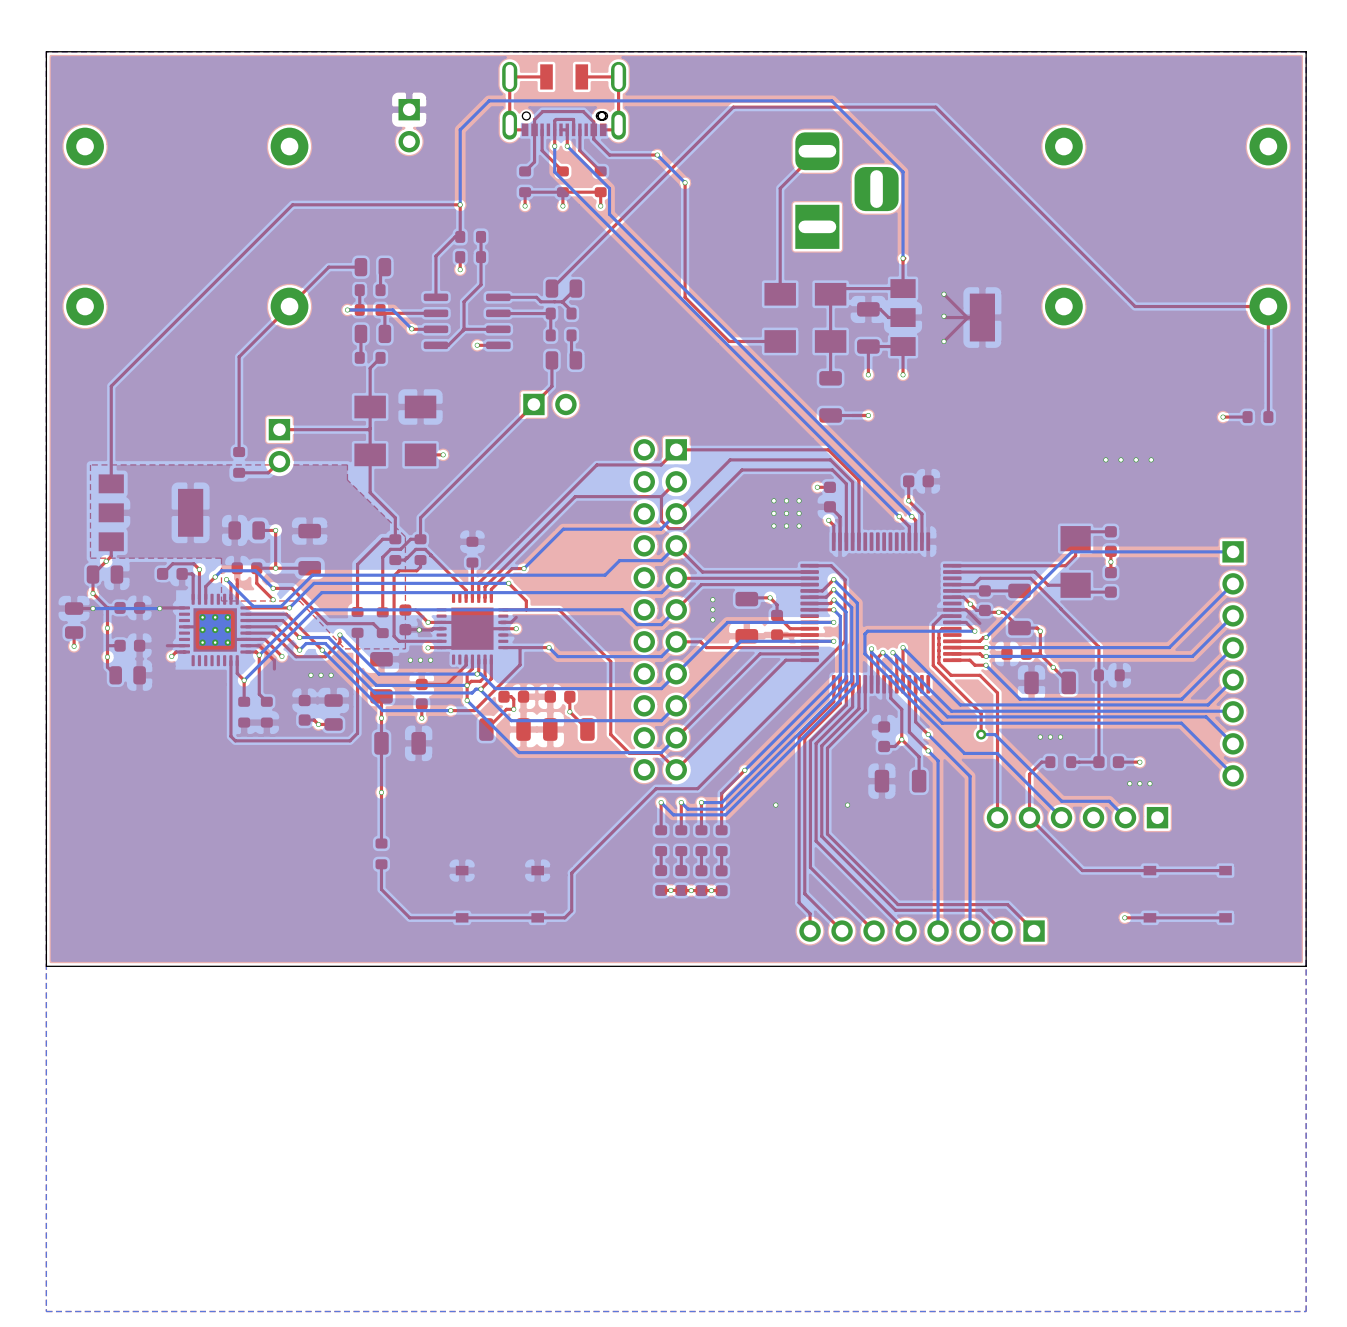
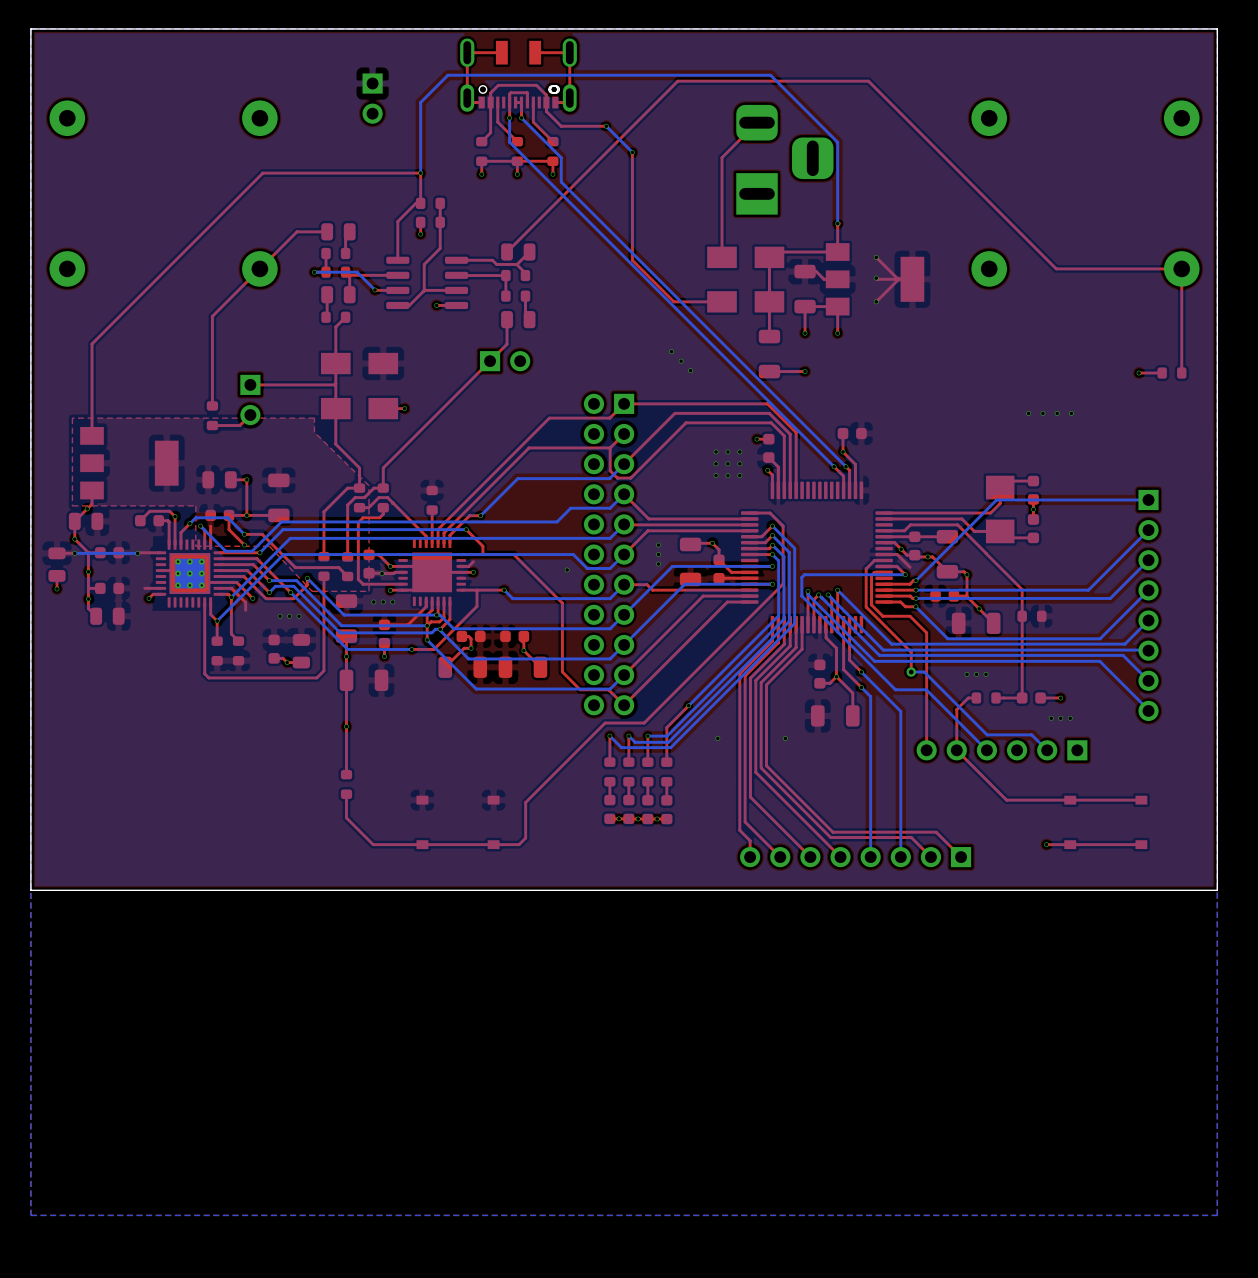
via: none -> (671, 351)
via: none -> (681, 361)
via: none -> (690, 370)
via: none -> (567, 569)

